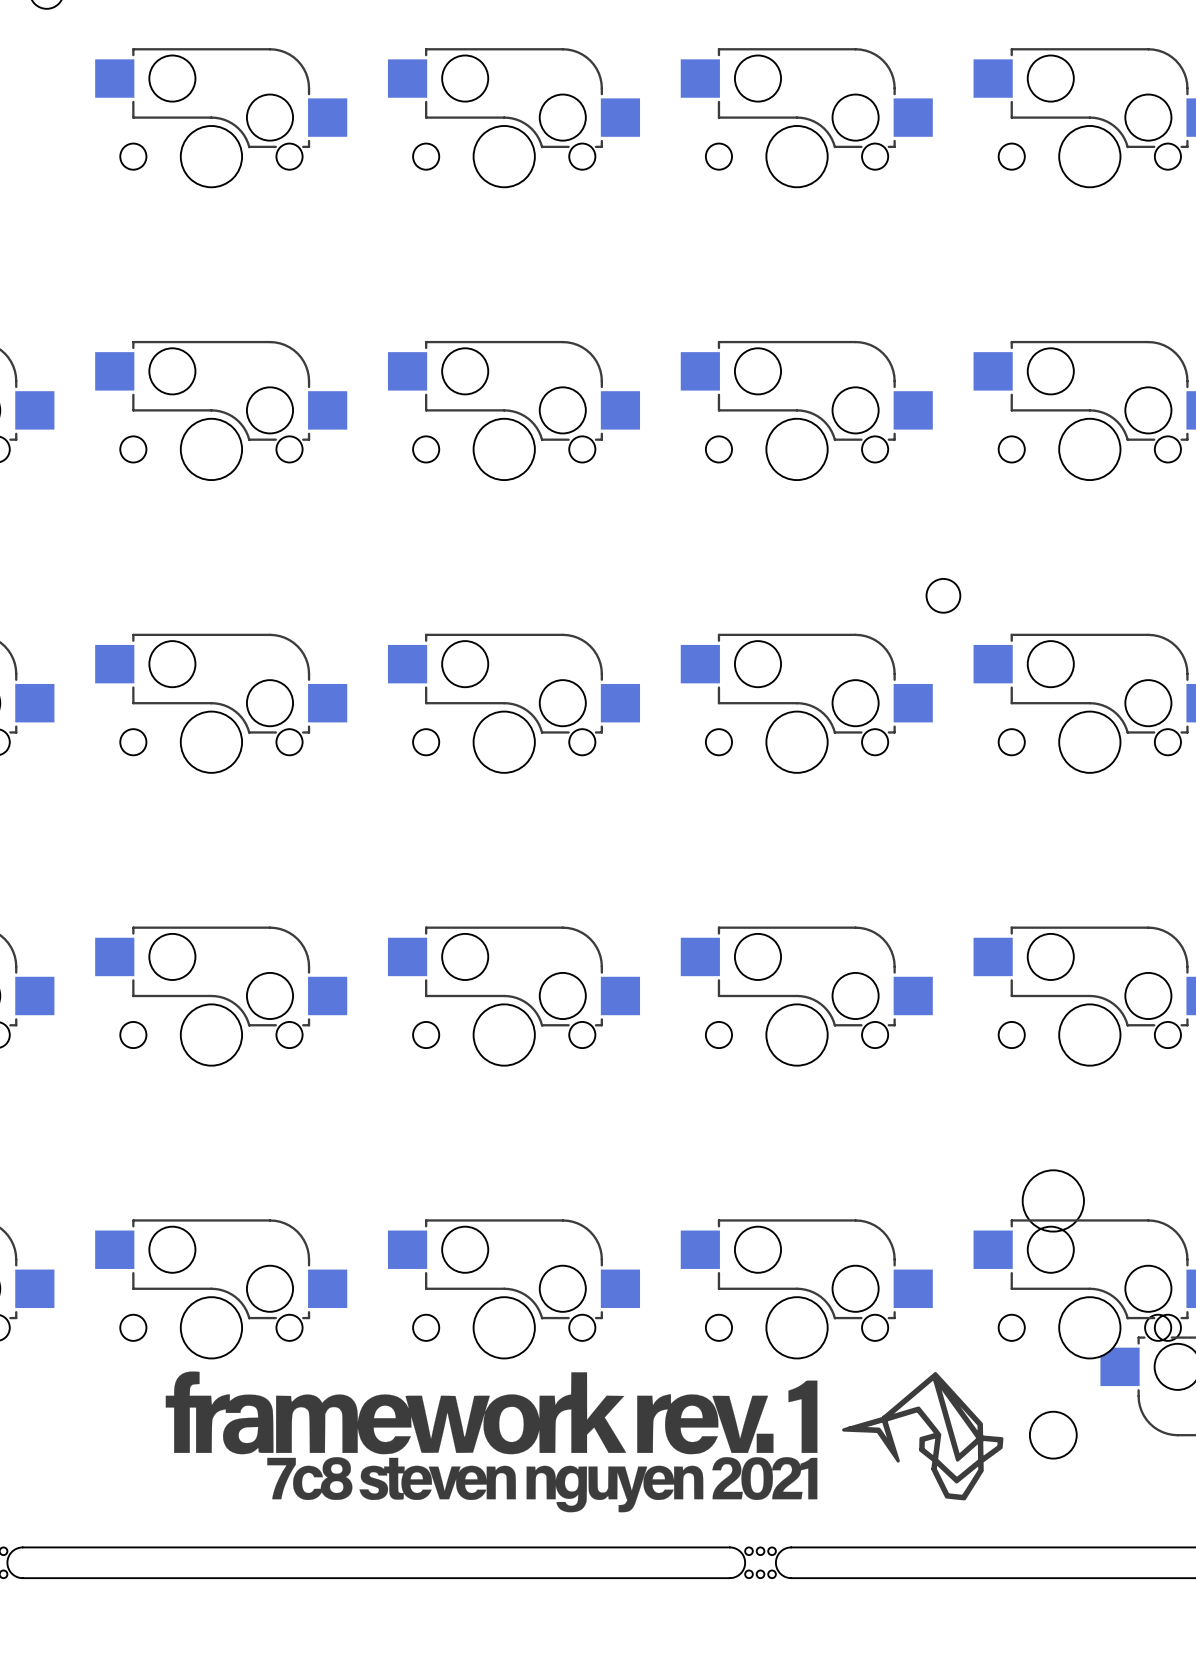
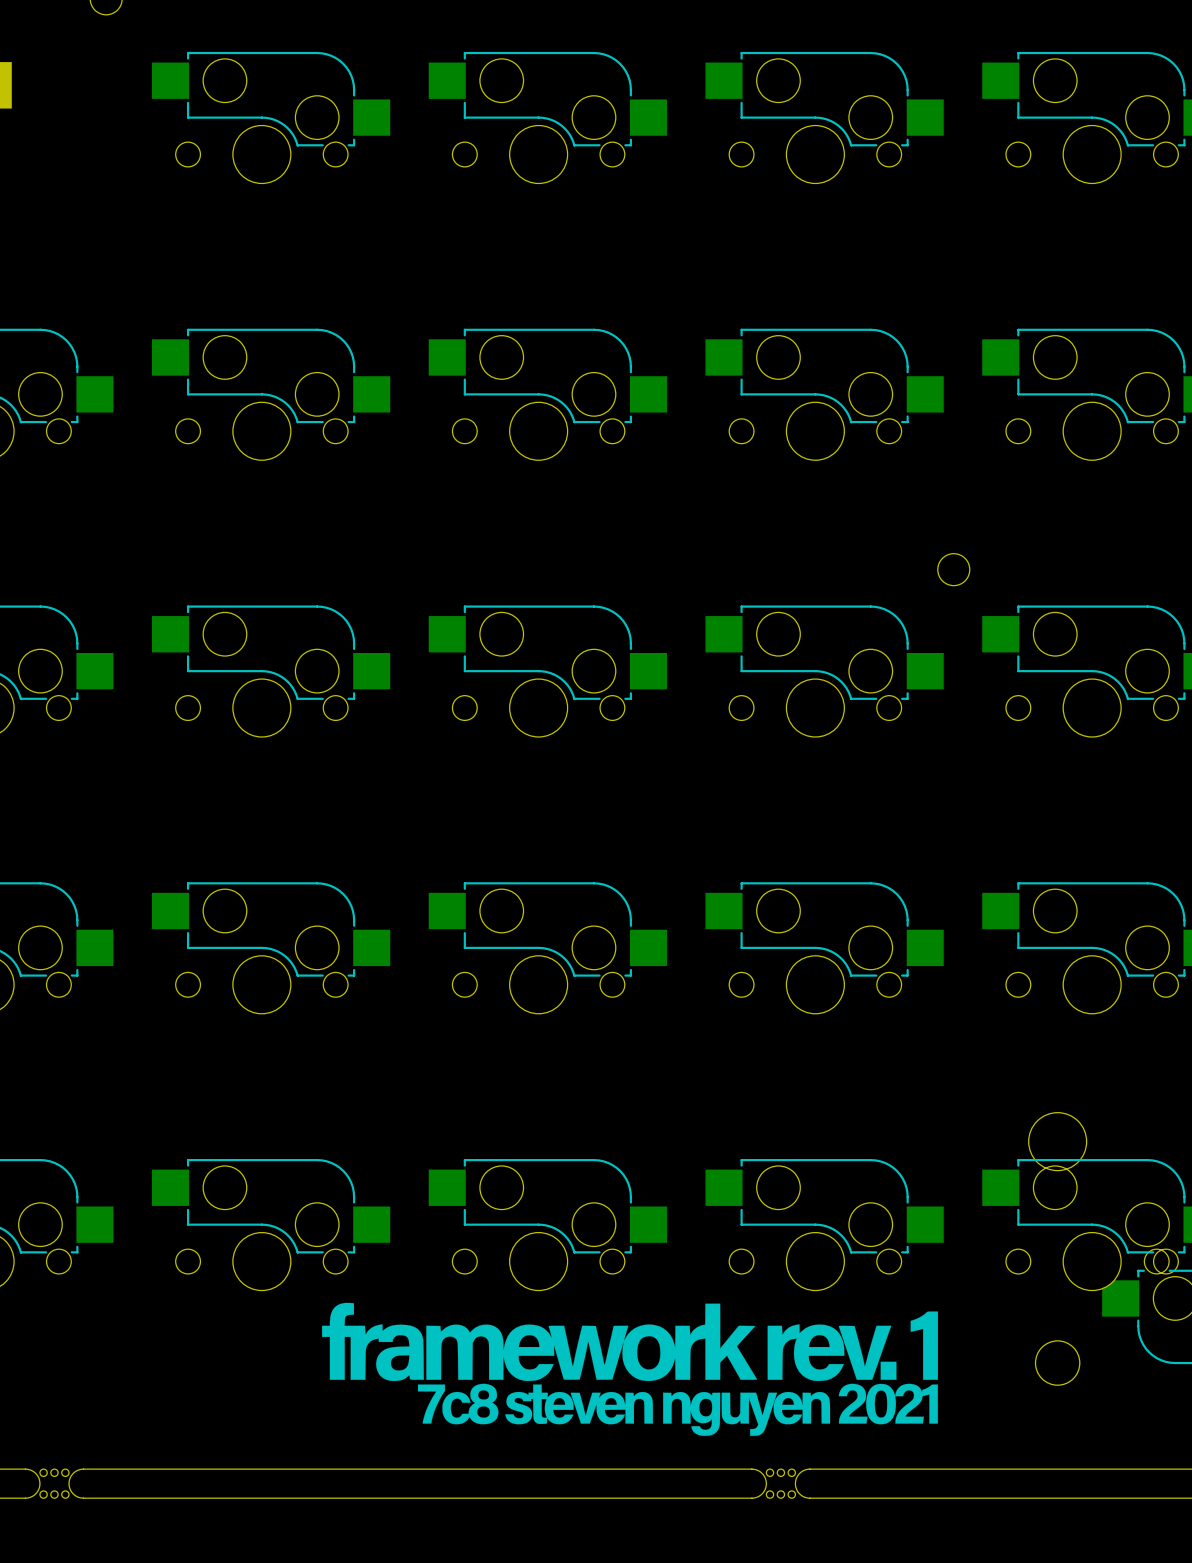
drawing: [842, 1372, 1004, 1501] -> none
drawing position: (491, 1412) -> (630, 1341)
drawing position: (542, 1484) -> (677, 1409)

